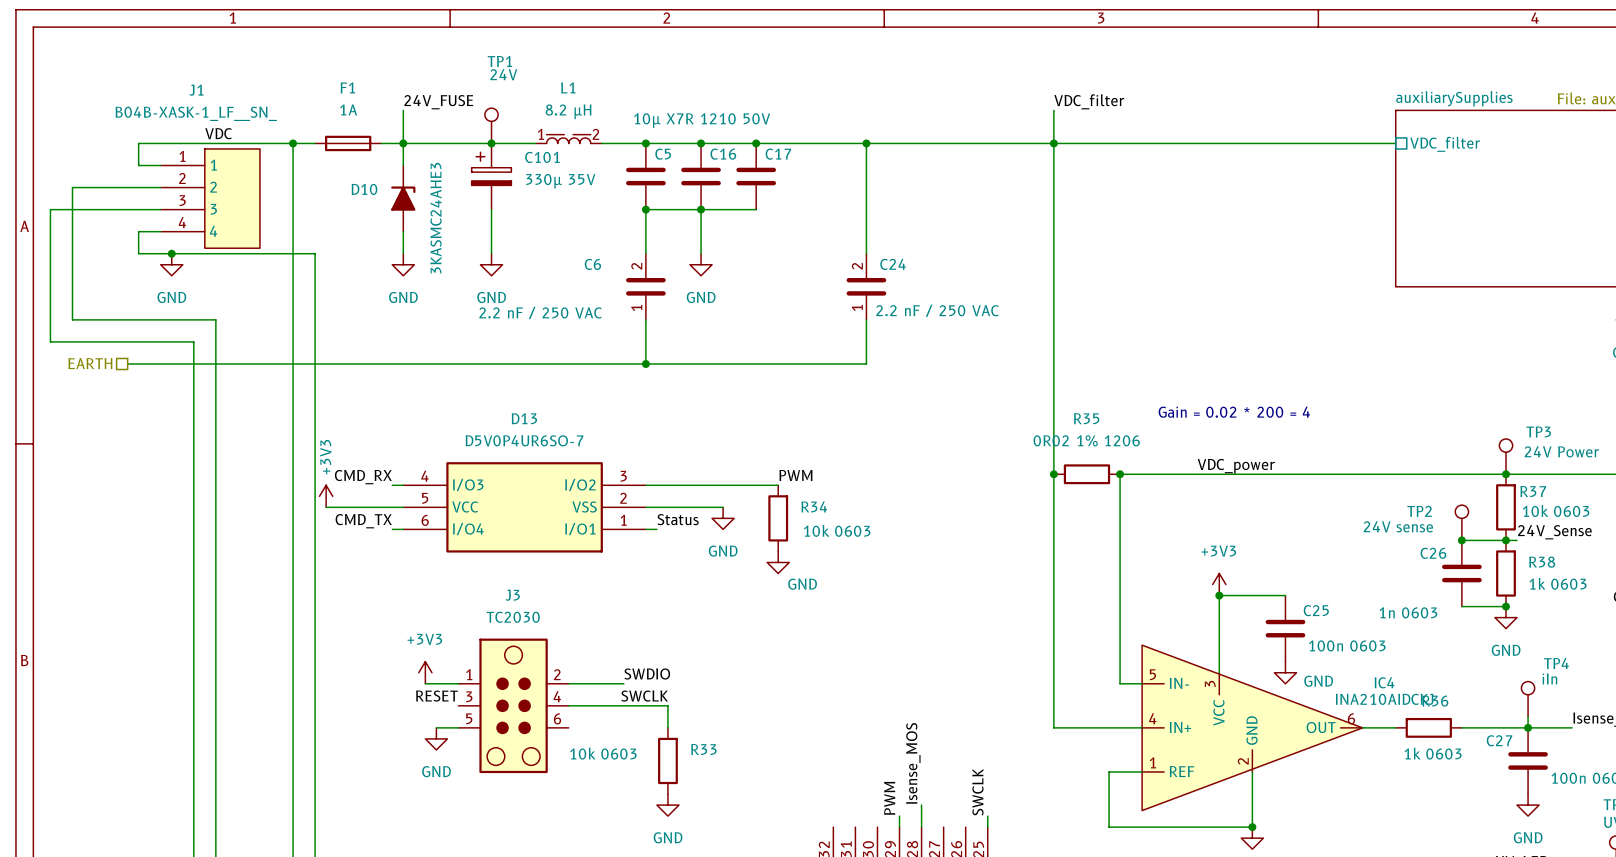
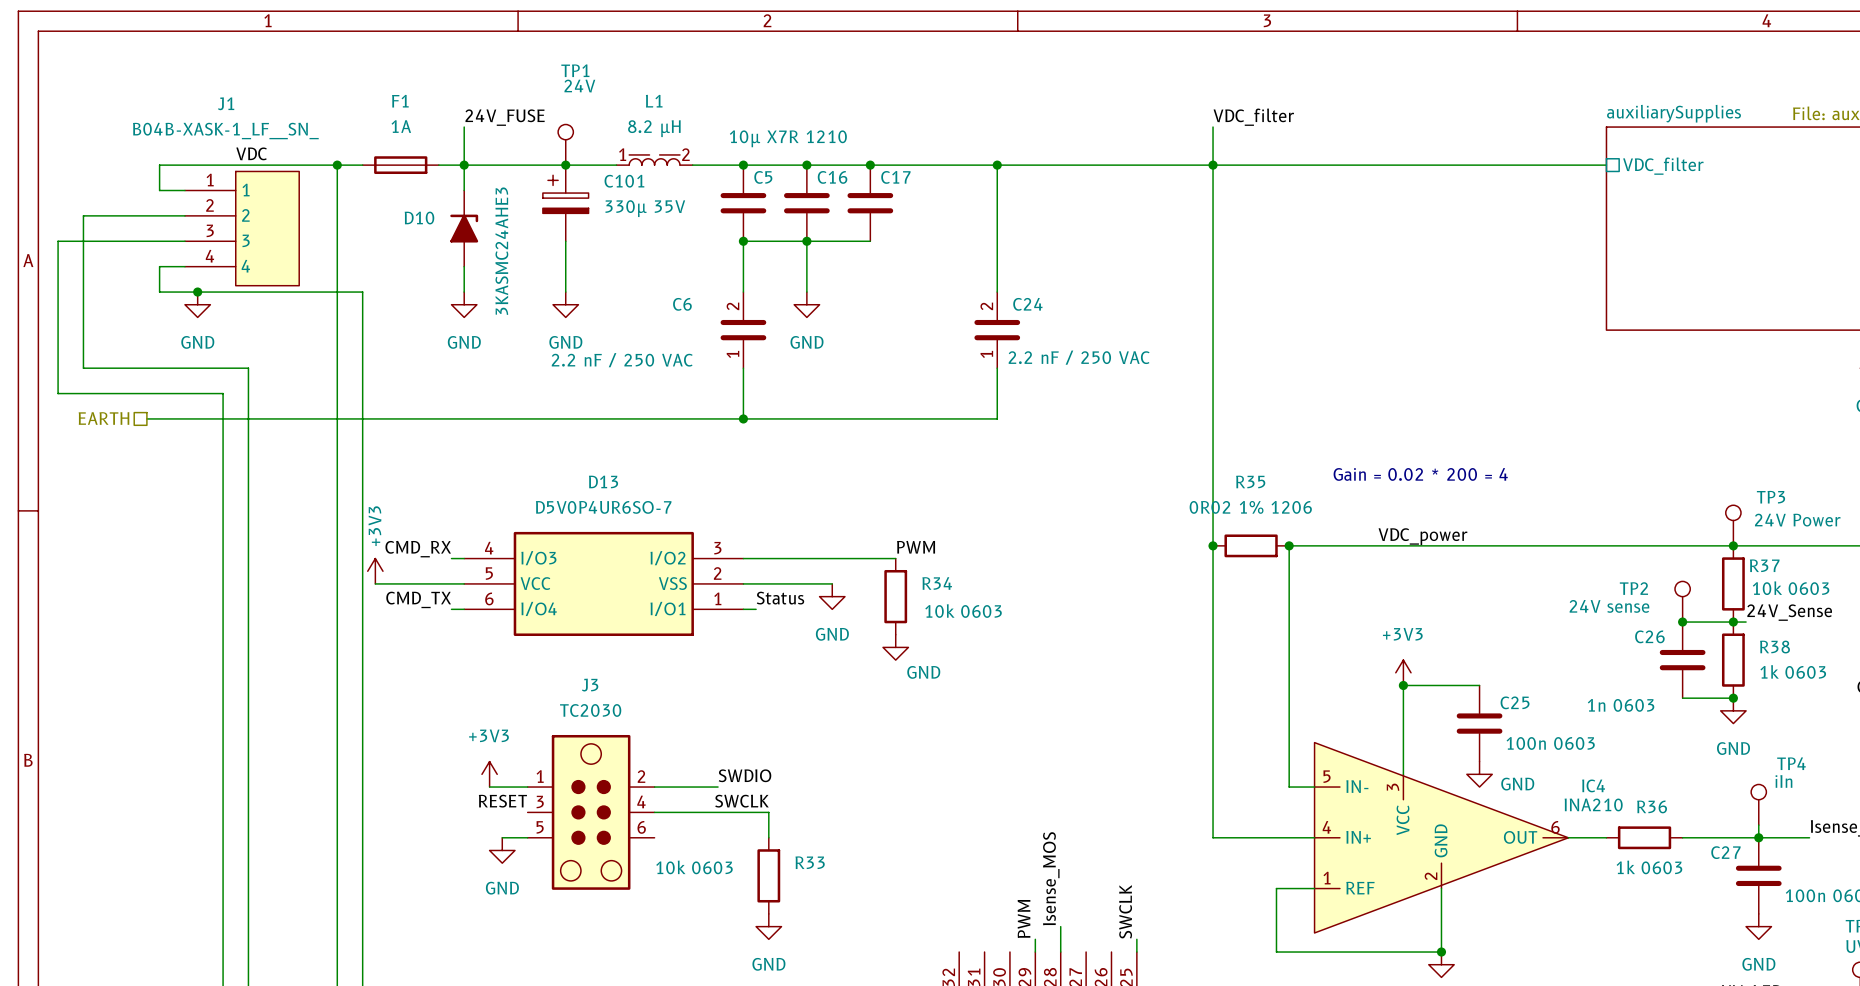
C17 value: 10µ X7R 1210 50V (702, 120) -> 10µ X7R 1210 (788, 138)
IC4 value: INA210AIDCKJ (1384, 699) -> INA210 (1593, 804)

